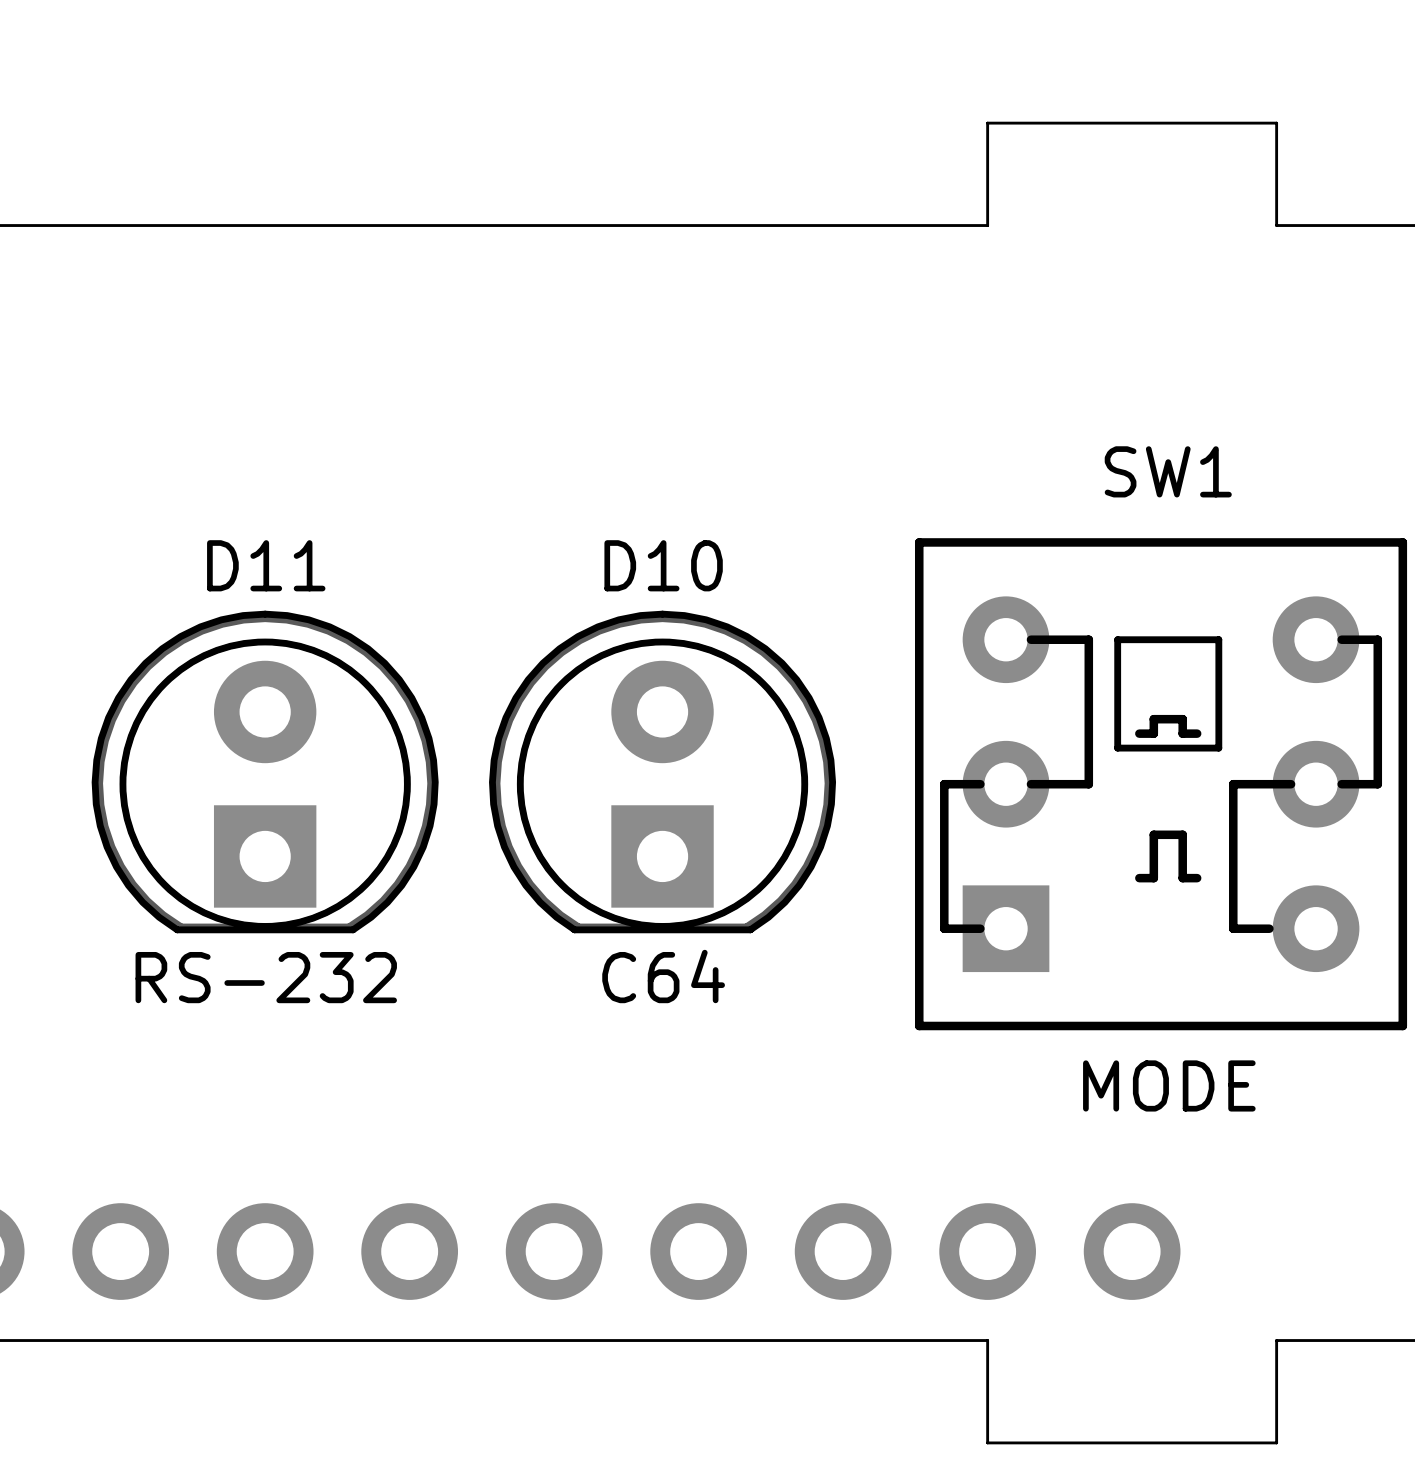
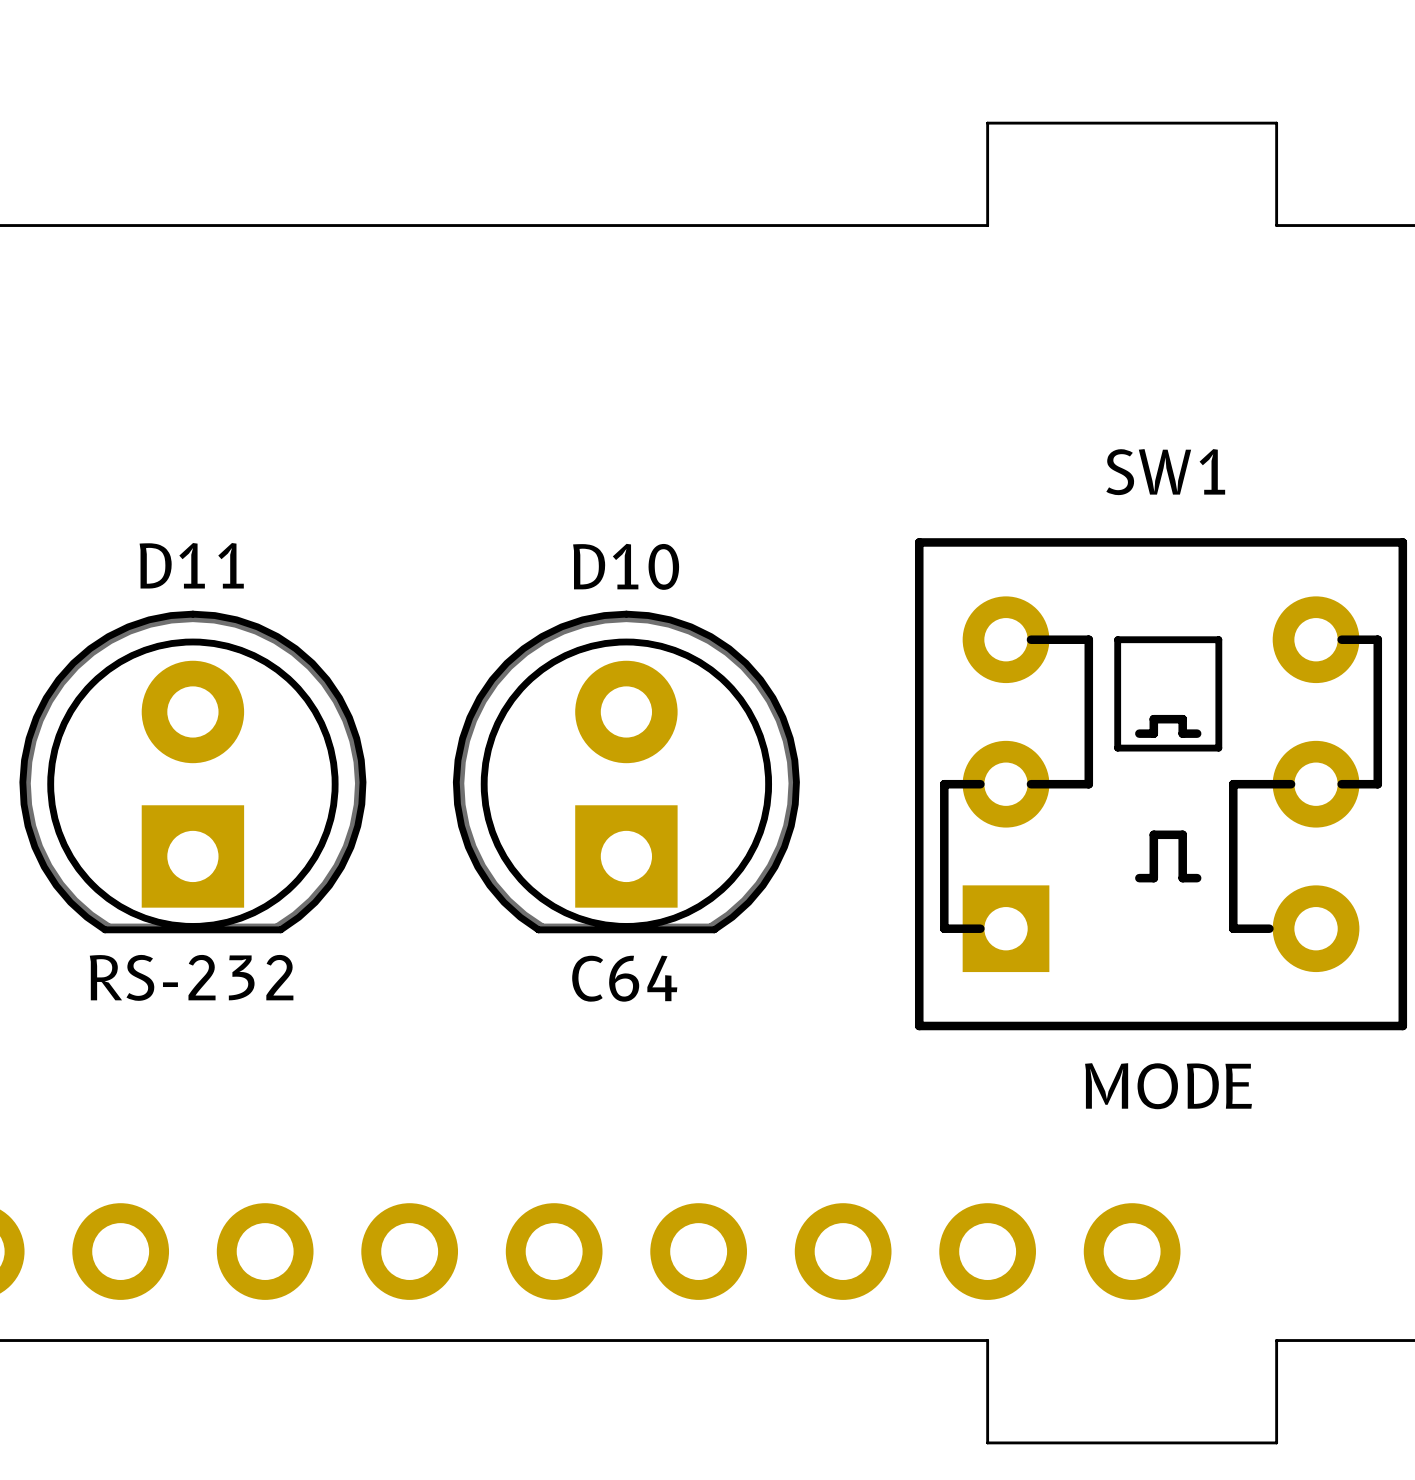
D11 position: (265, 771) -> (192, 771)
D10 position: (662, 771) -> (626, 771)

